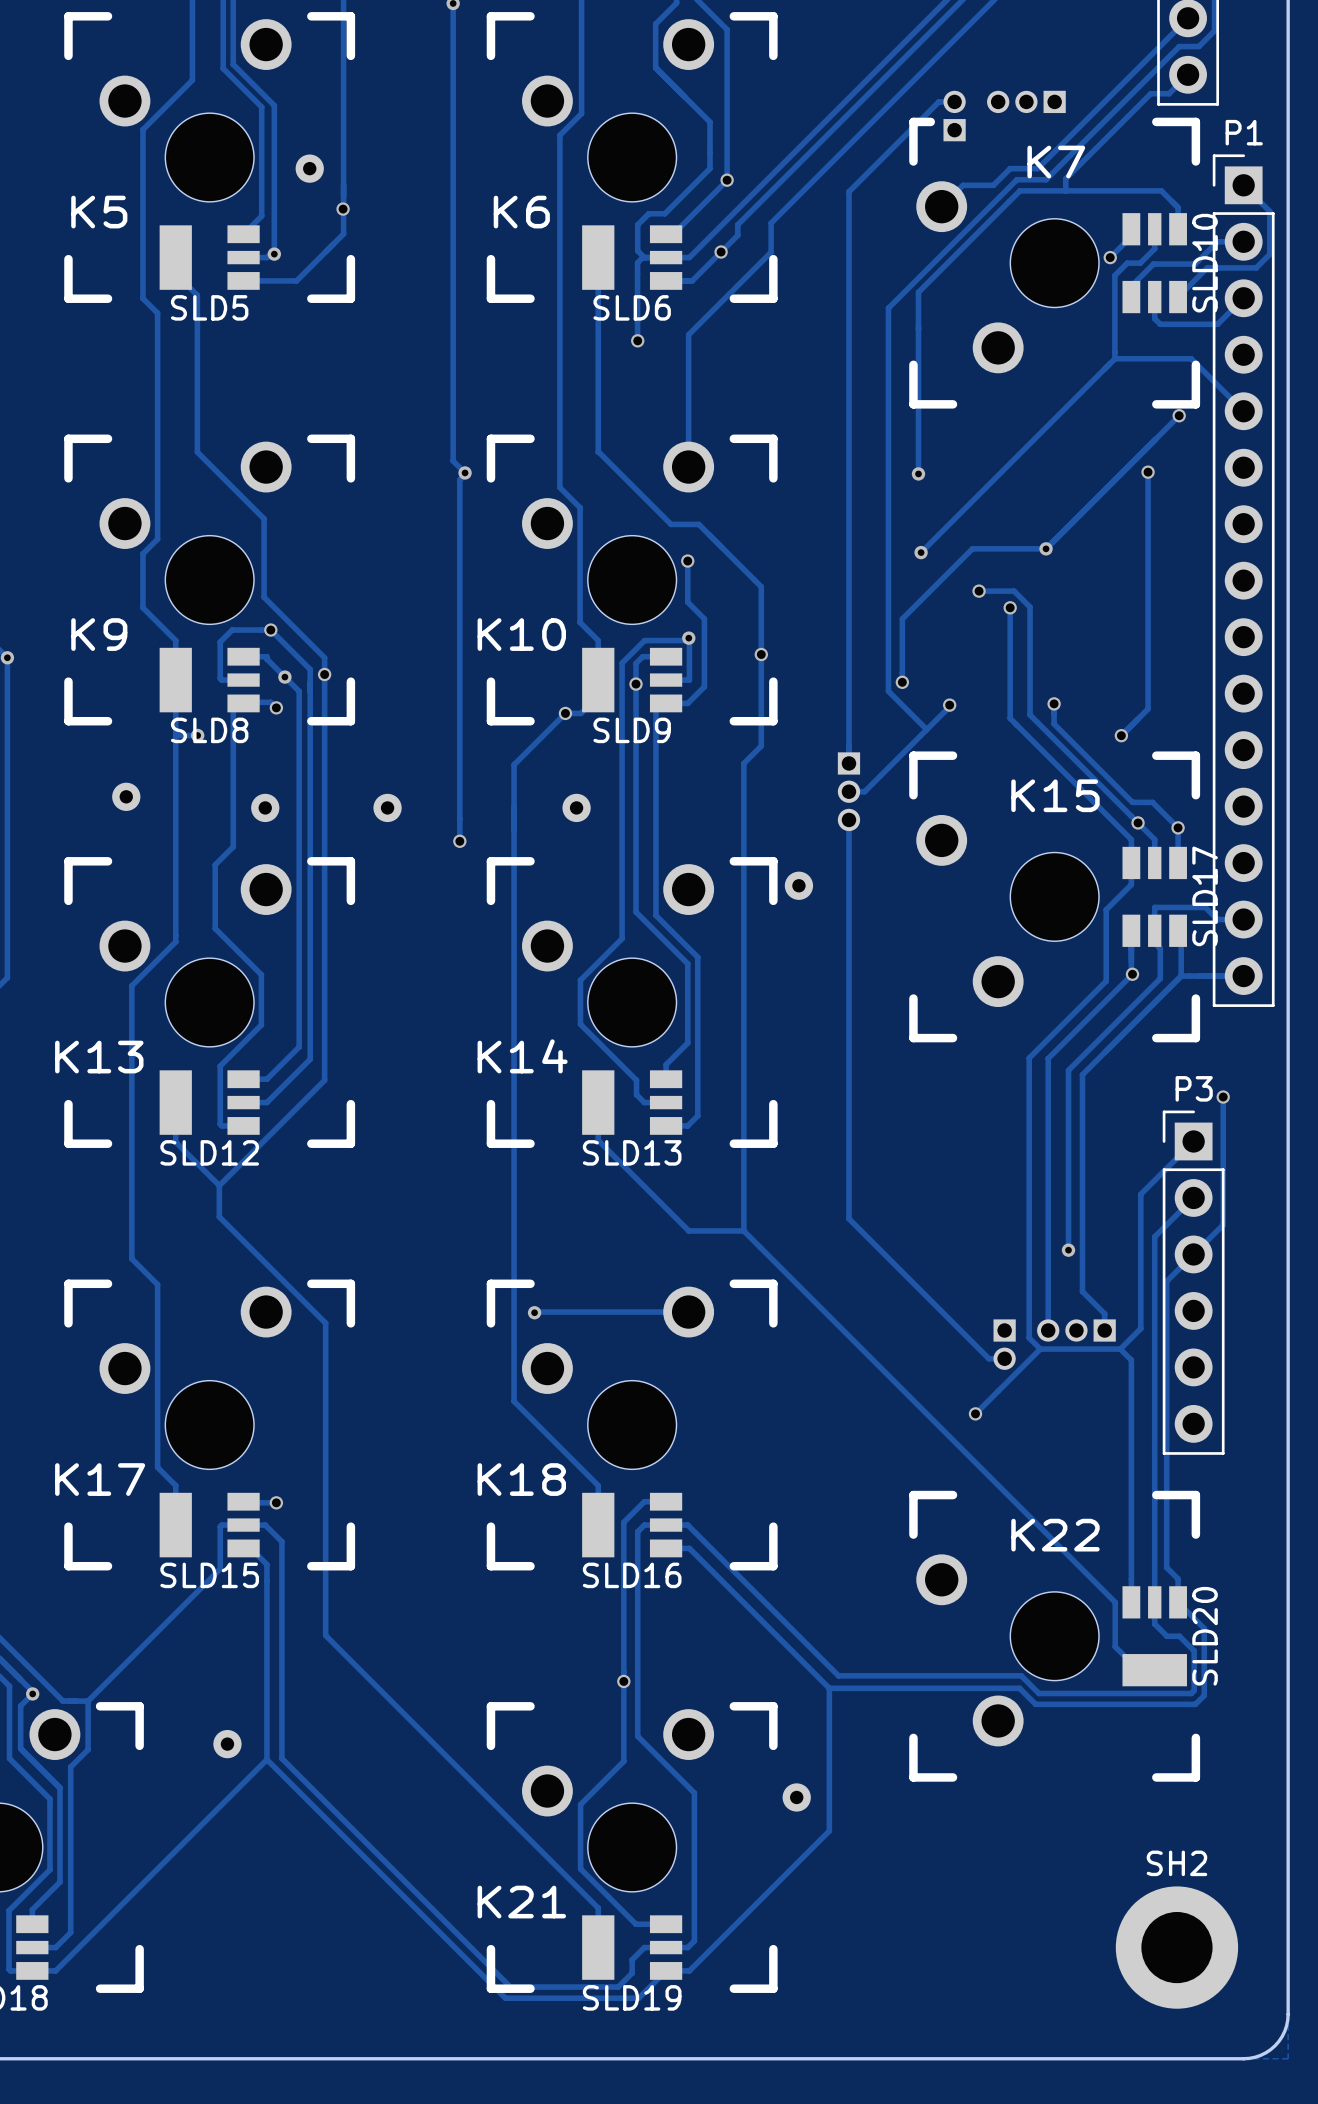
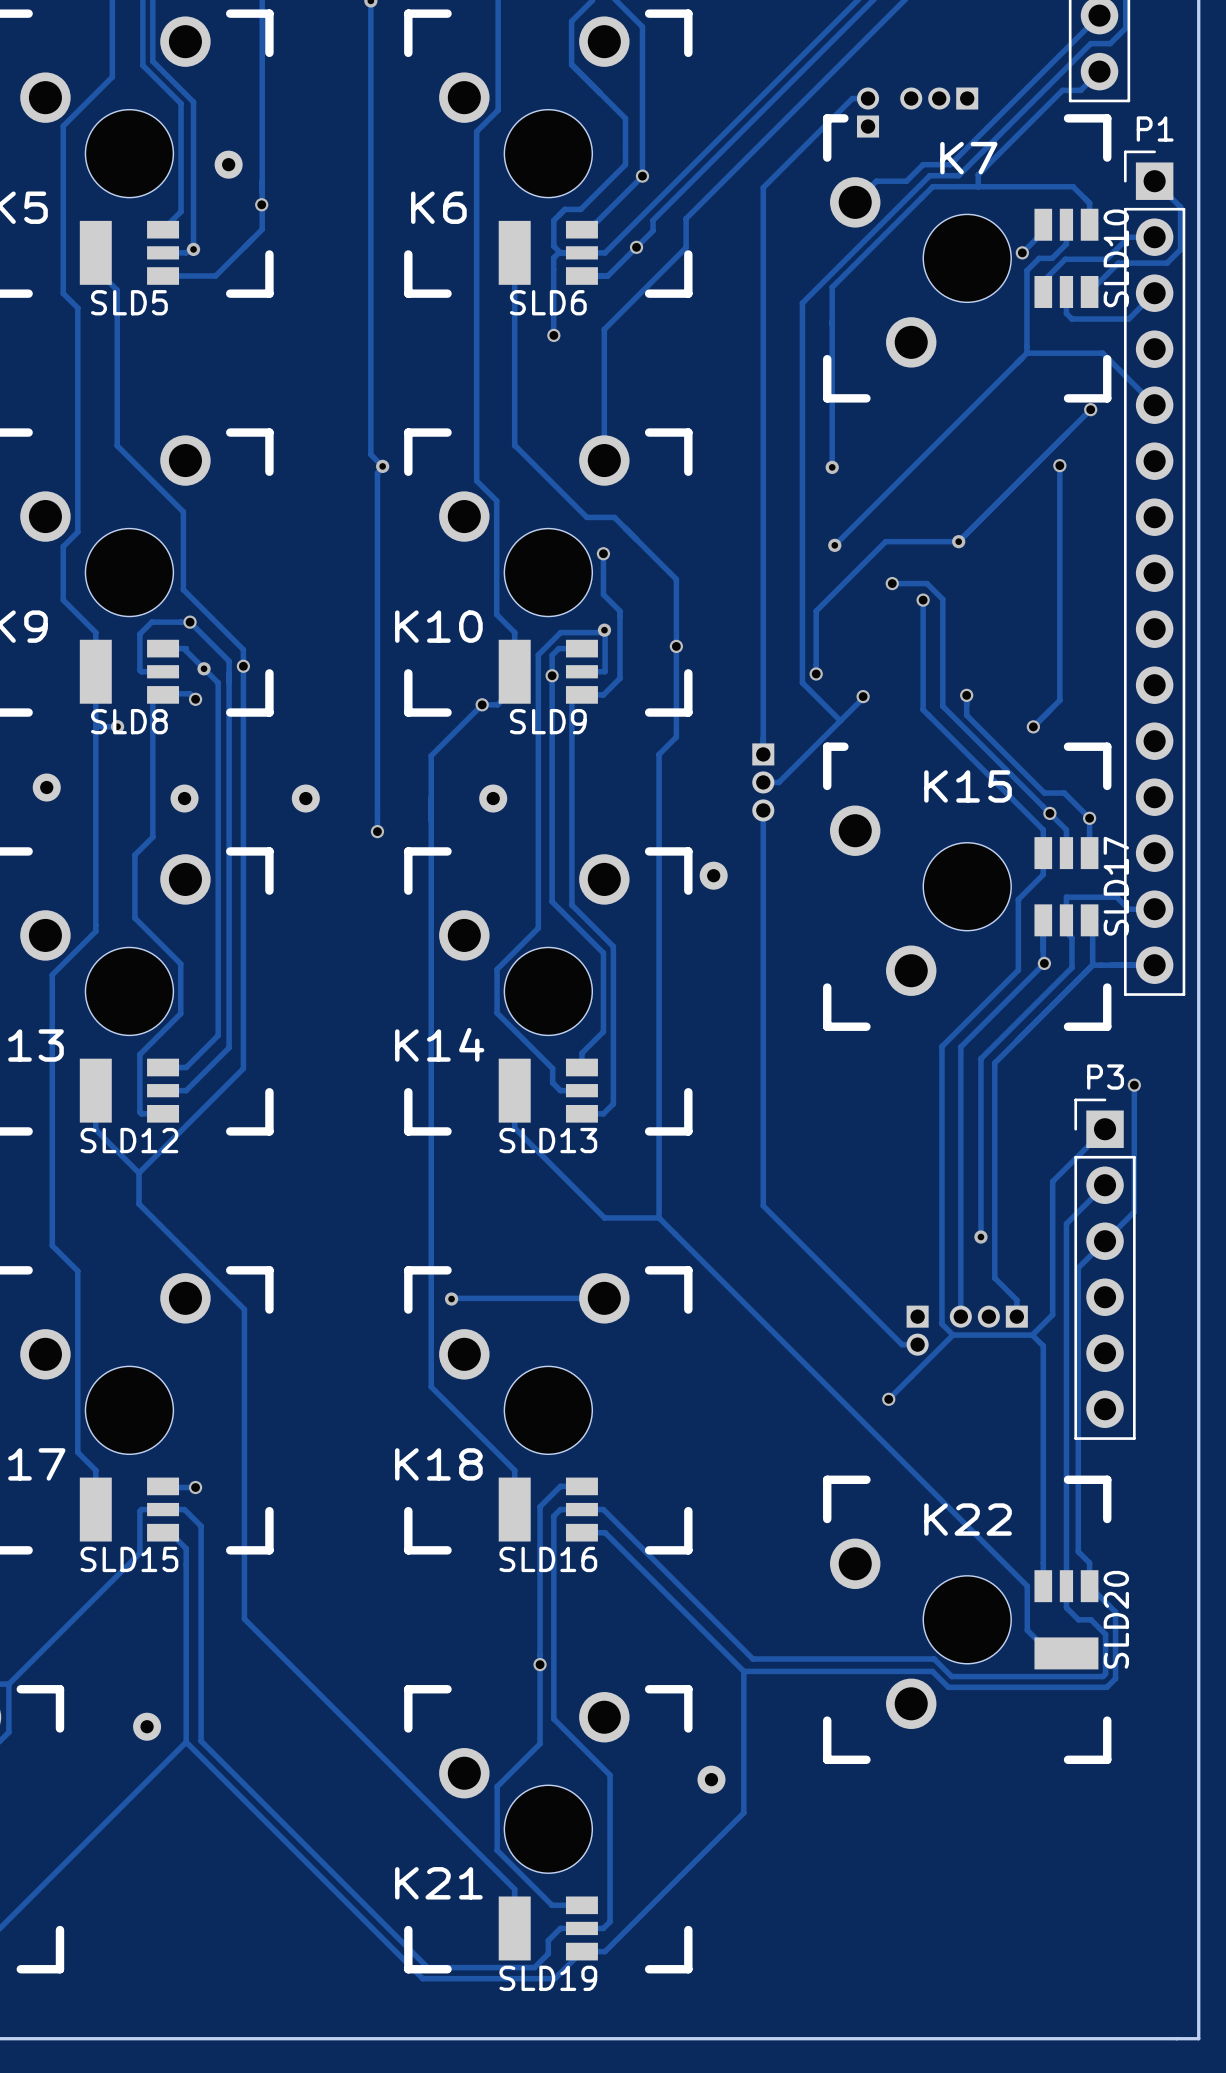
K15 footprint: [909, 751, 1201, 1043] -> [823, 742, 1112, 1031]
SH2: (1176, 1947) -> none
board edge: (1288, 2014) (1284, 2031) (1275, 2045) (1260, 2055) (1243, 2058) -> (1198, 1994) (1198, 2038) (1154, 2038)

